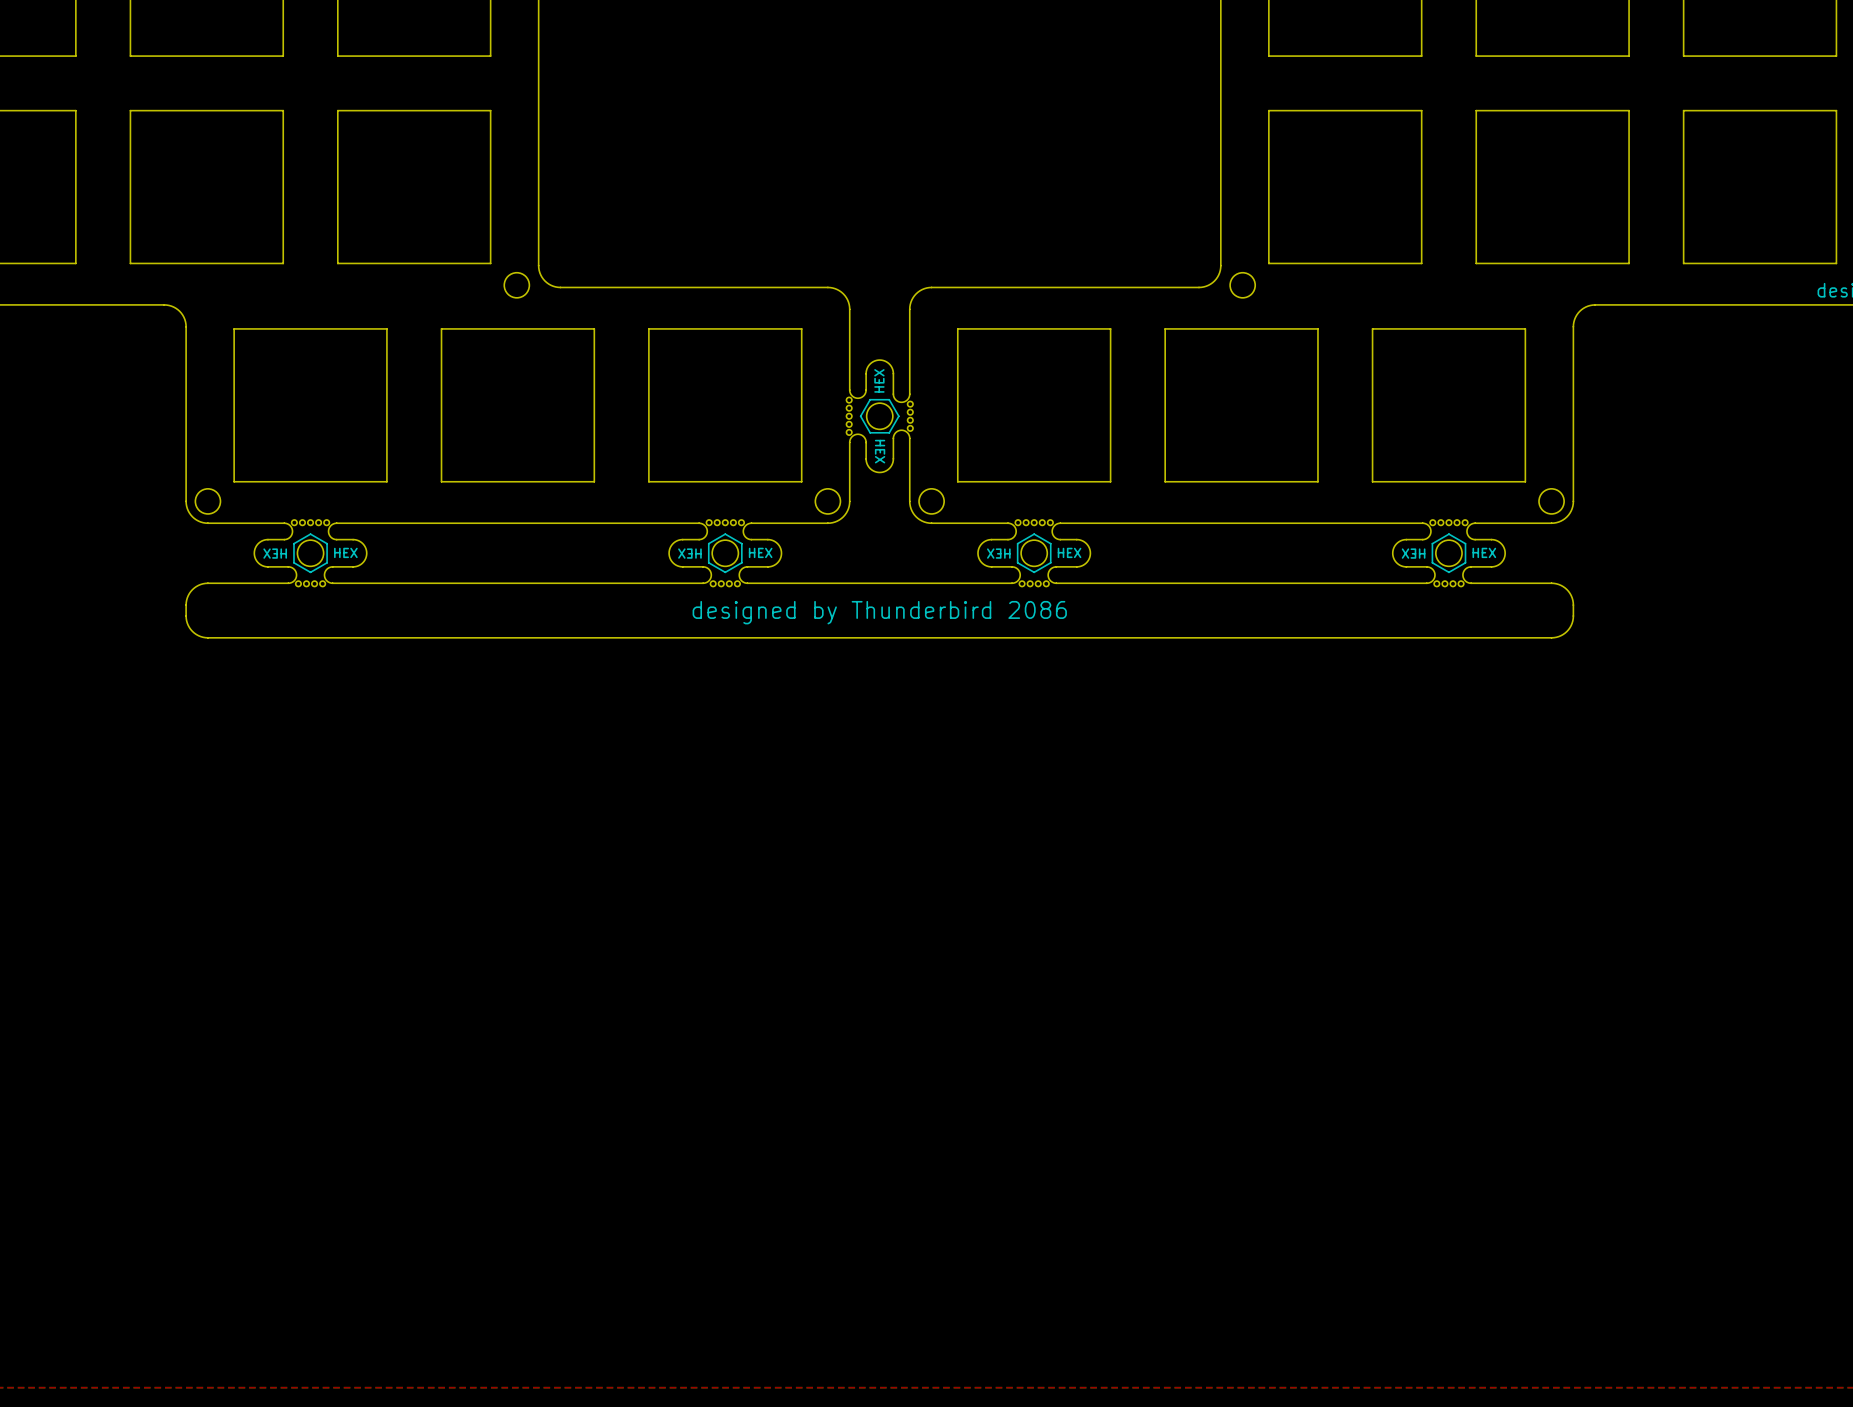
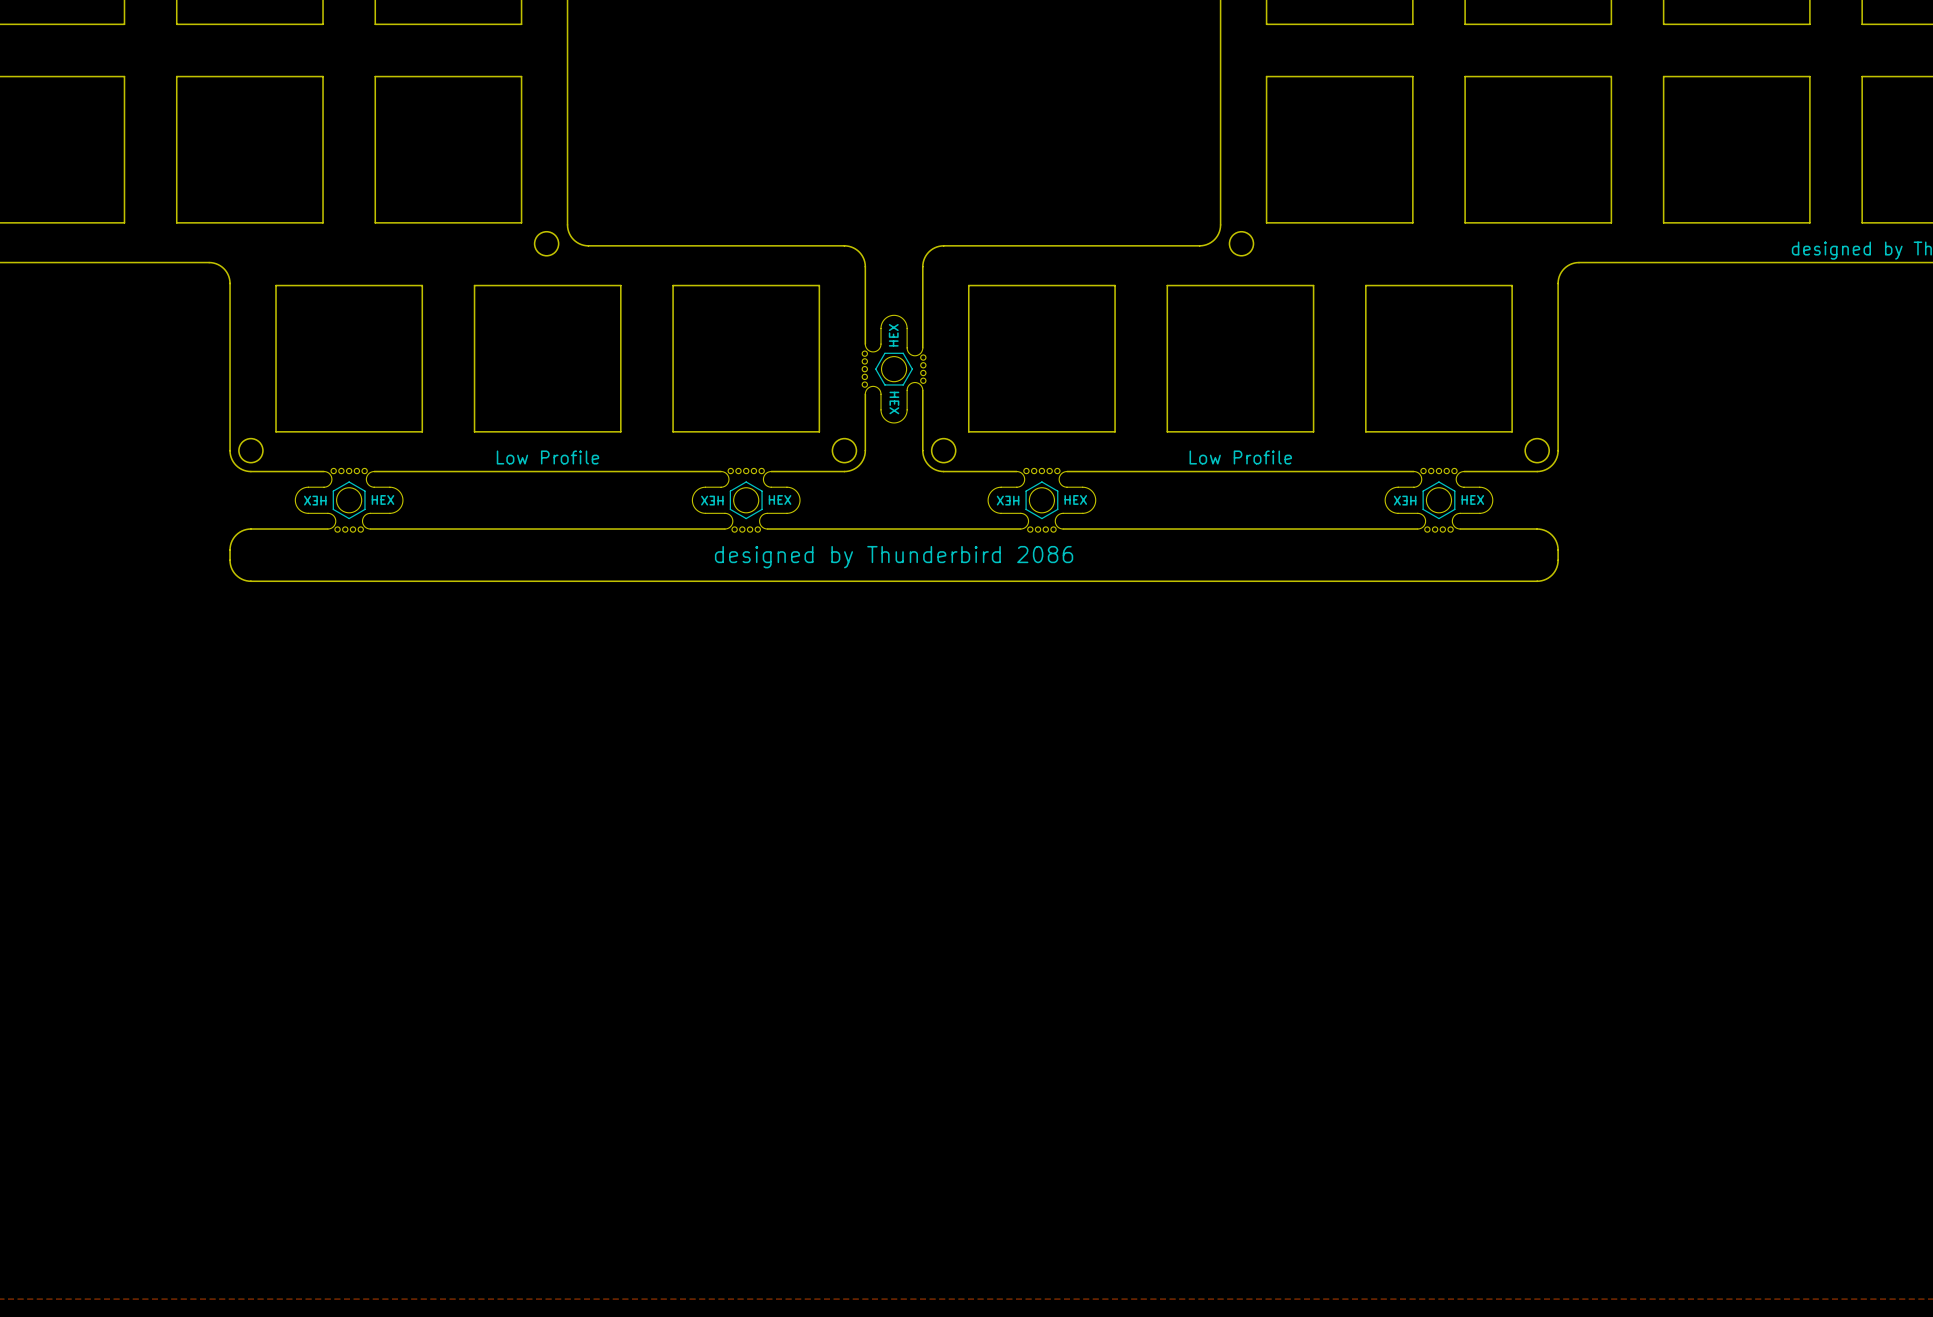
text: none -> Low Profile (547, 457)
text: none -> Low Profile (1240, 457)

